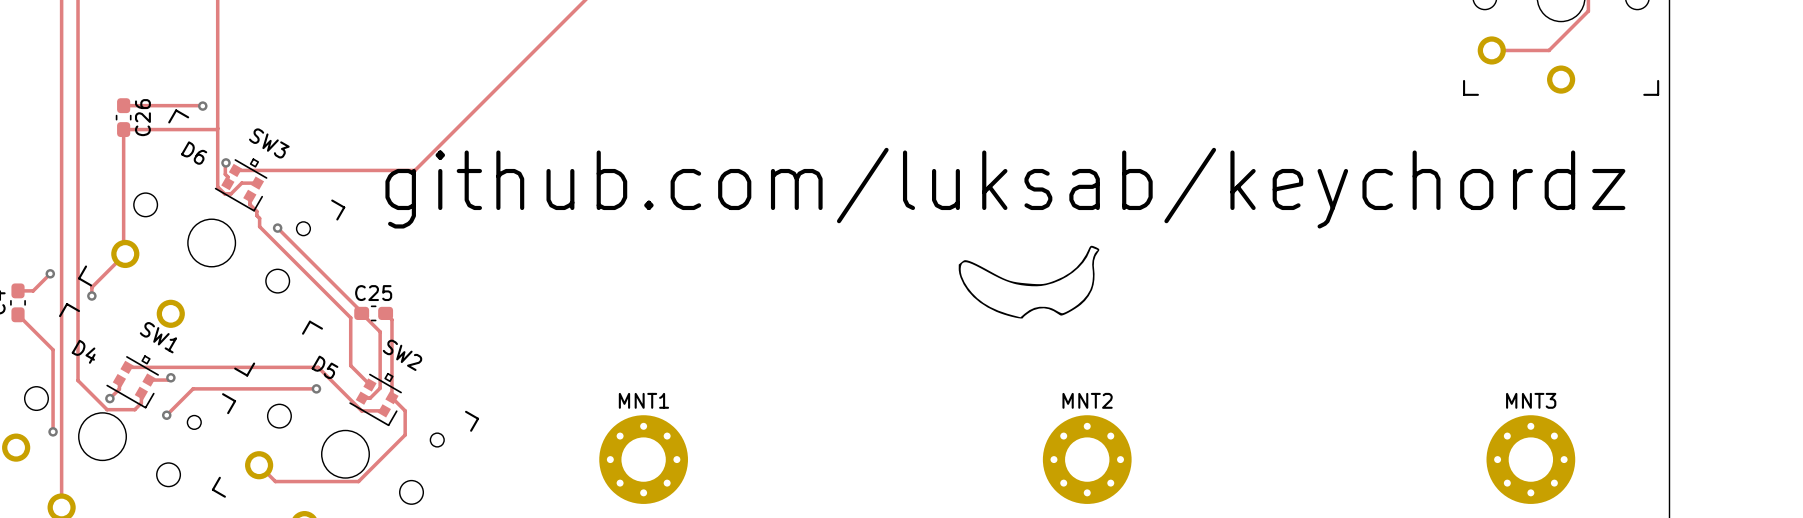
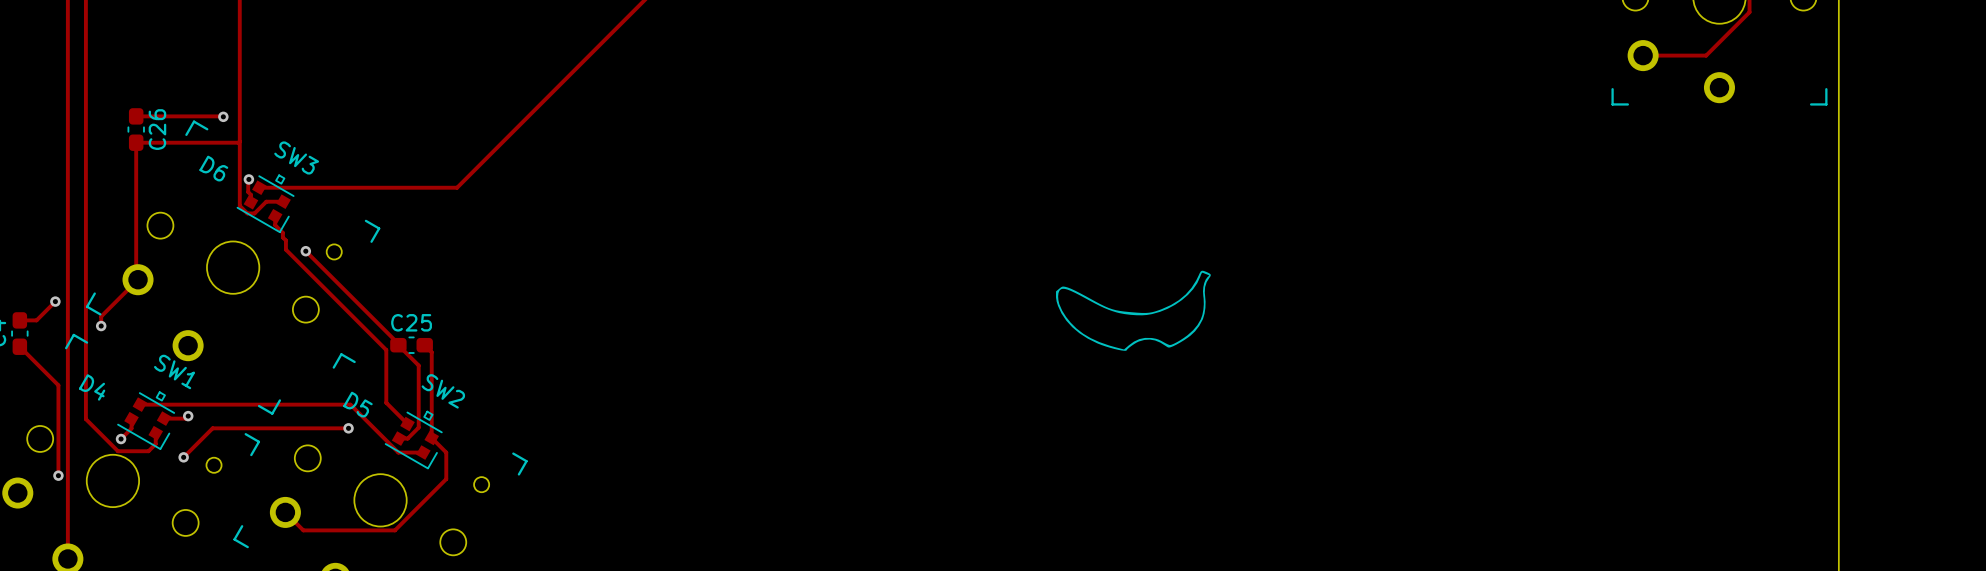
text: github.com/luksab/keychordz (1005, 188) -> none
MNT1: (643, 459) -> none
MNT2: (1087, 459) -> none
MNT3: (1530, 459) -> none

